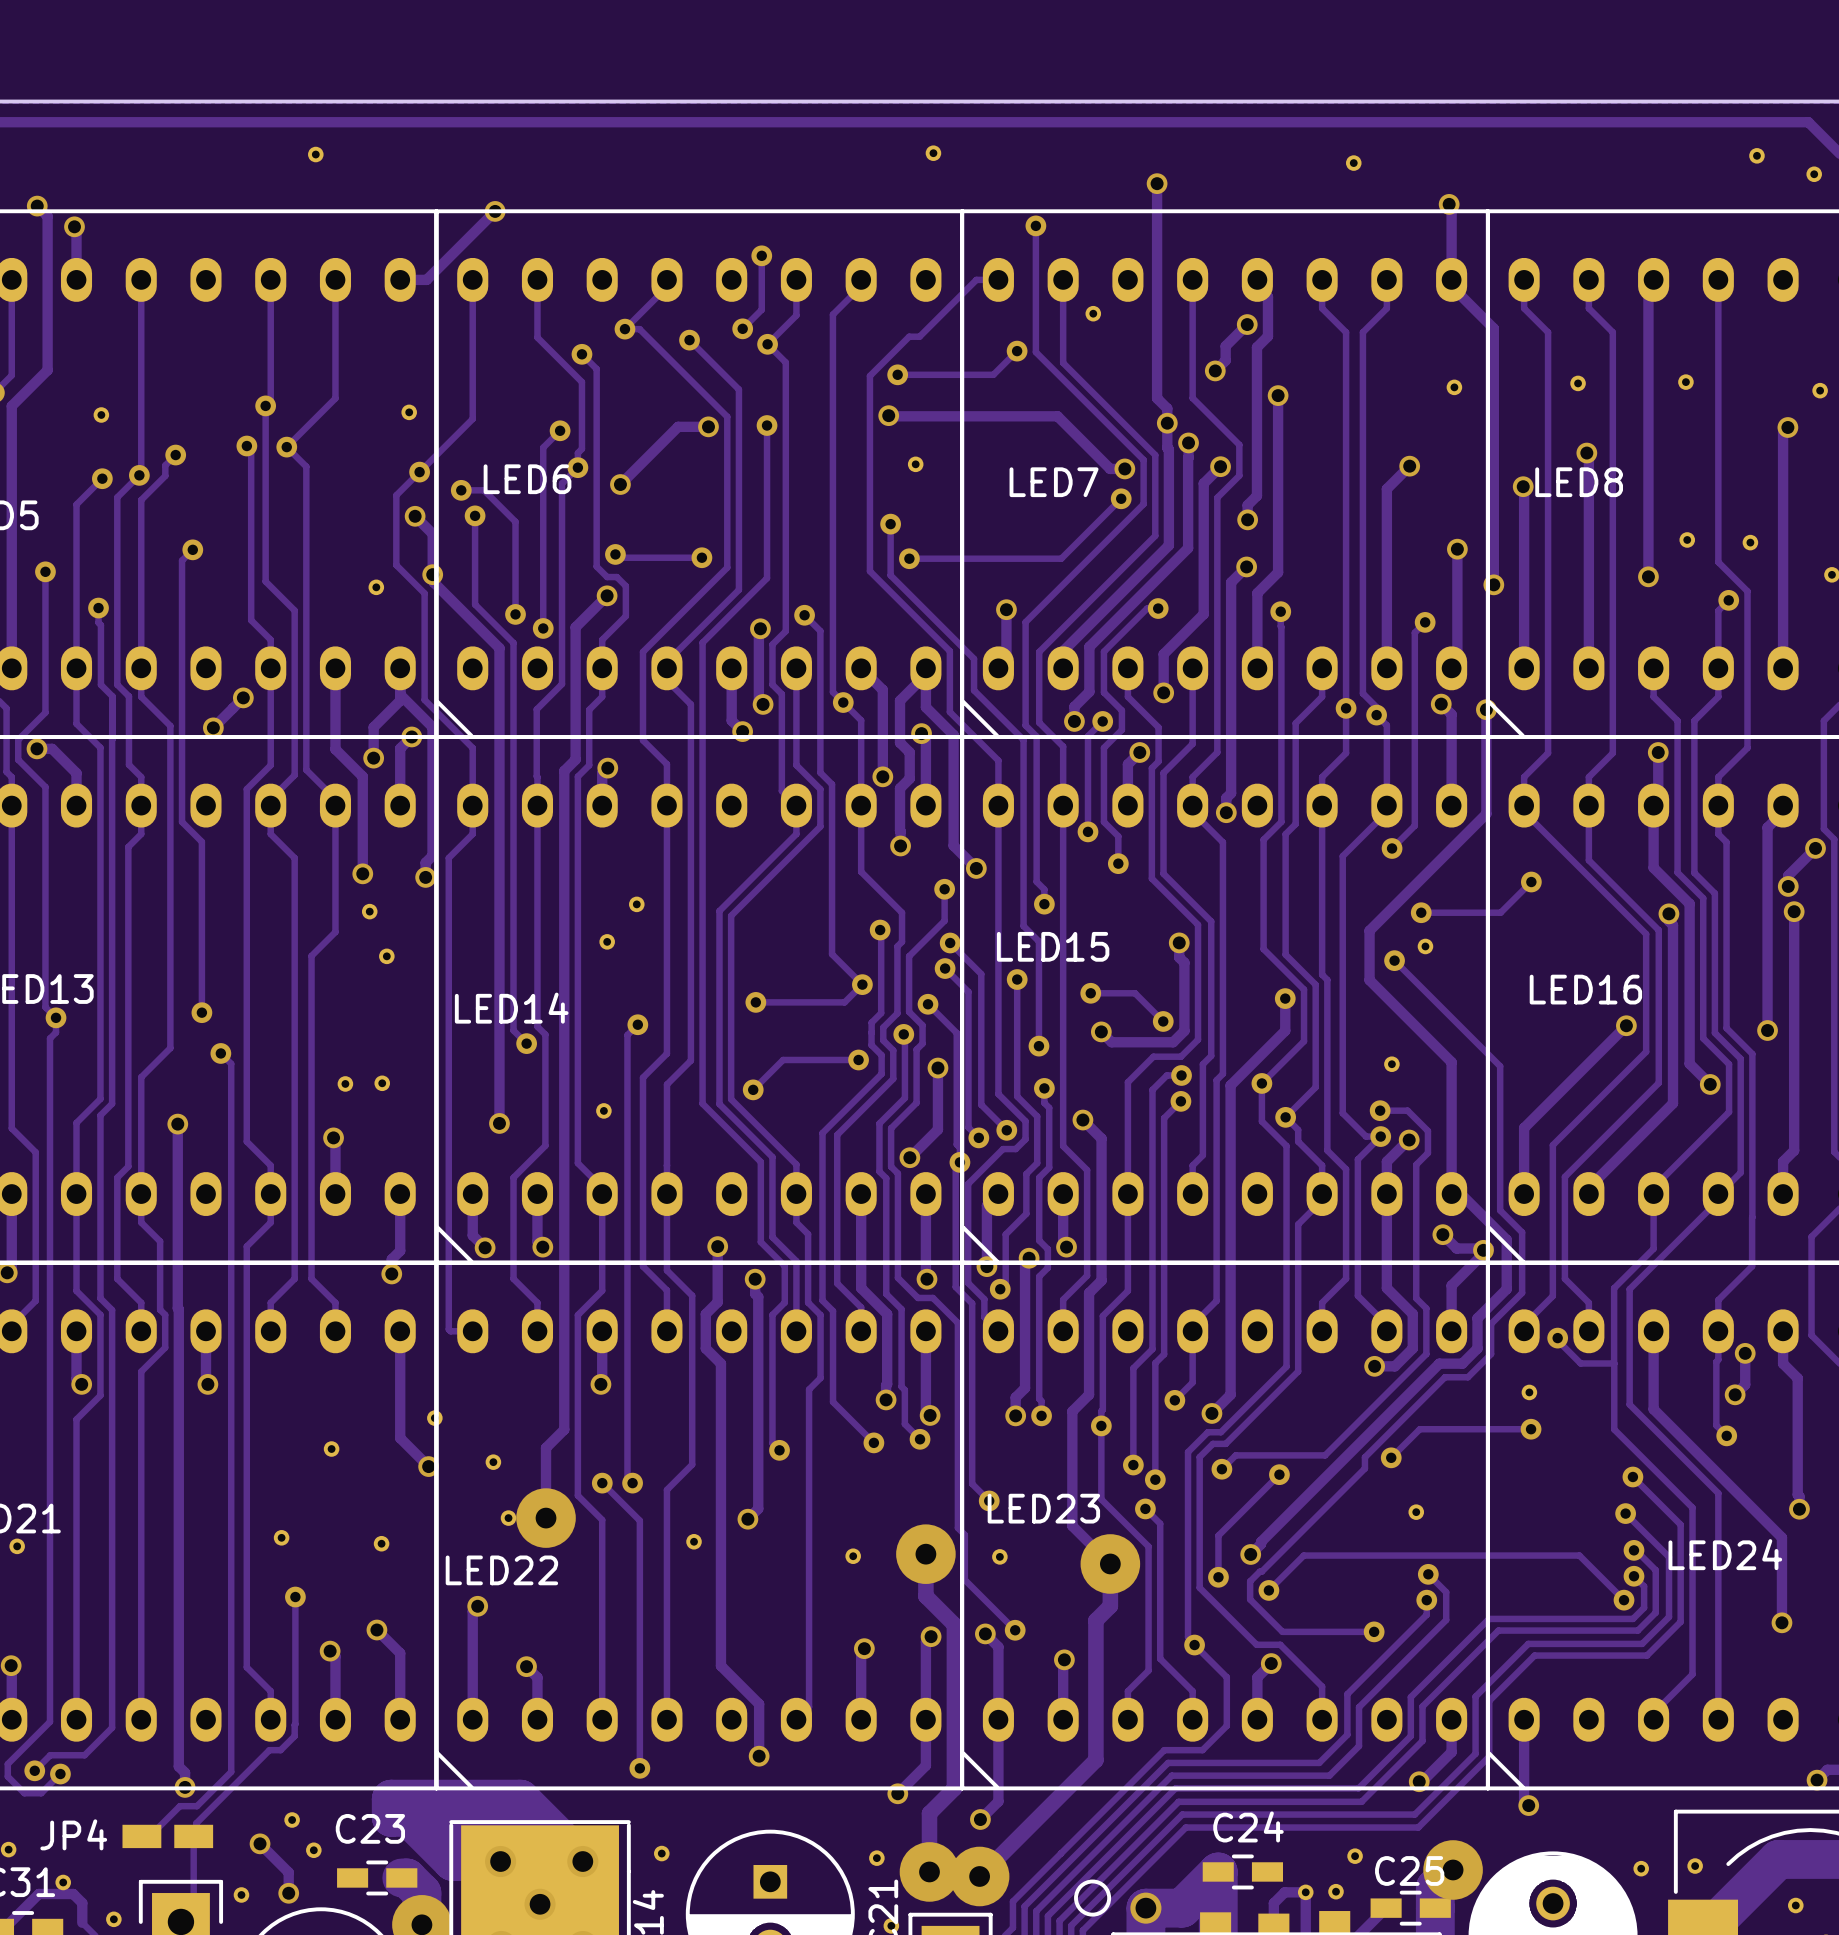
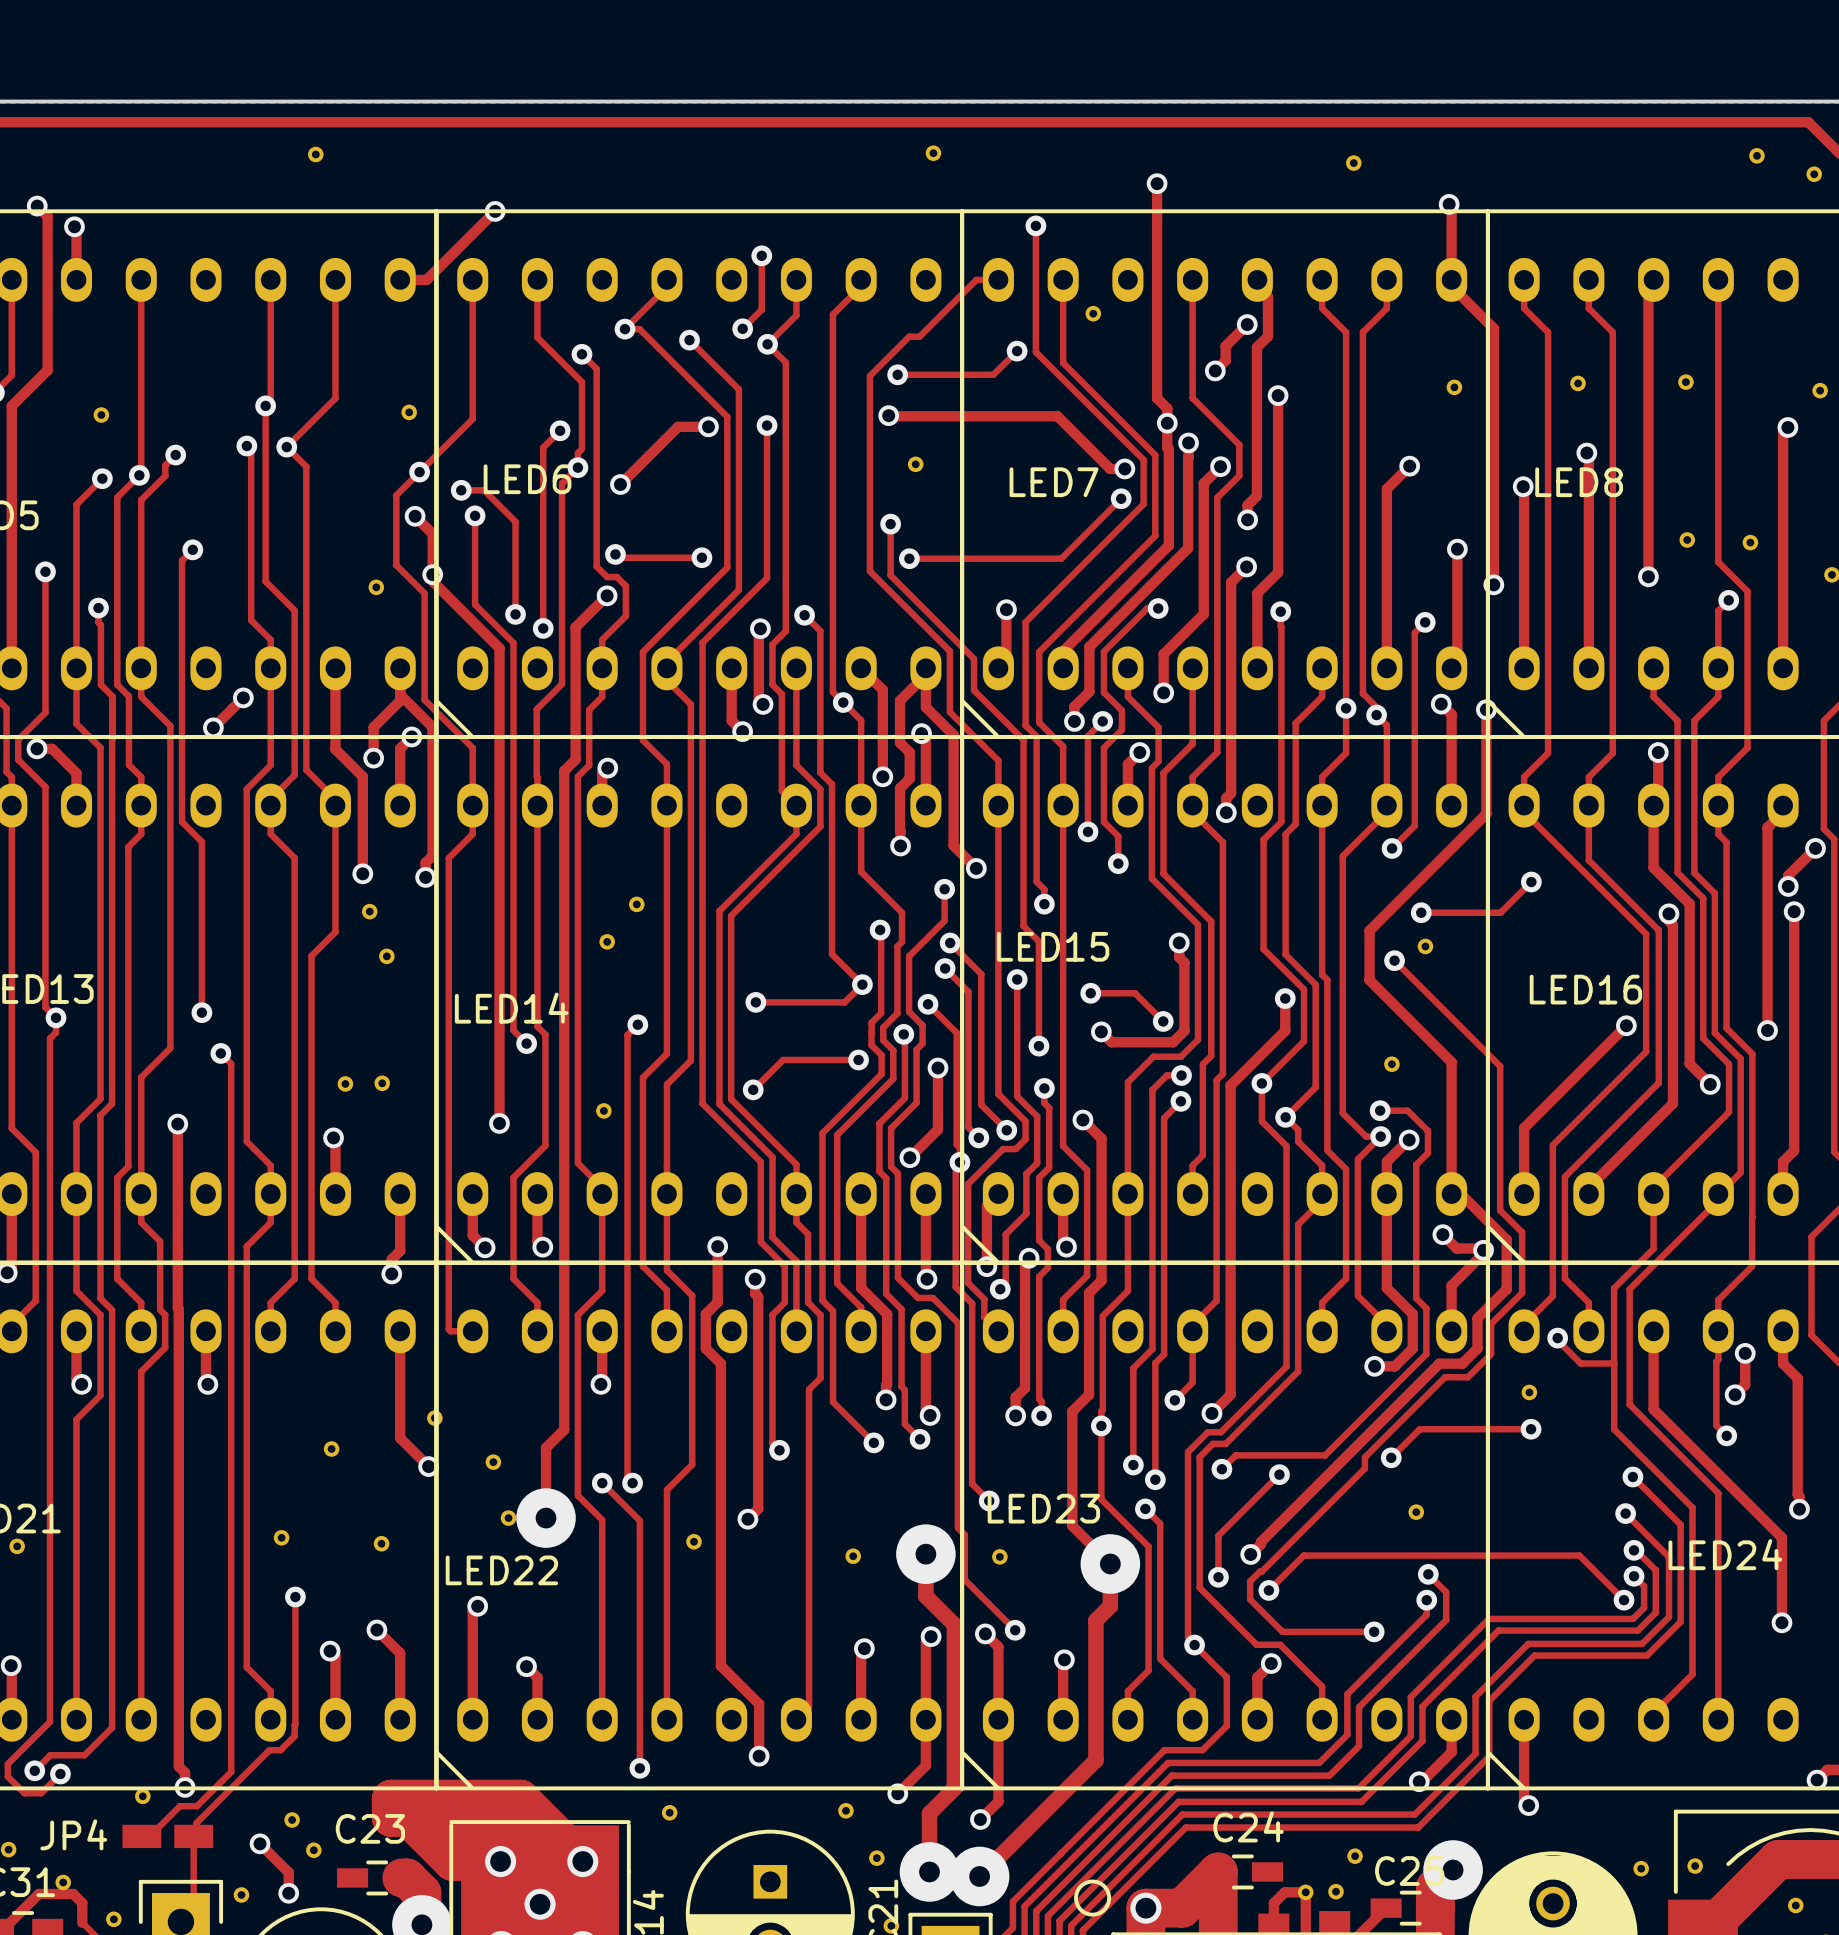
part: none -> (142, 1796)
part: none -> (845, 1810)
part position: (661, 1853) -> (669, 1812)

